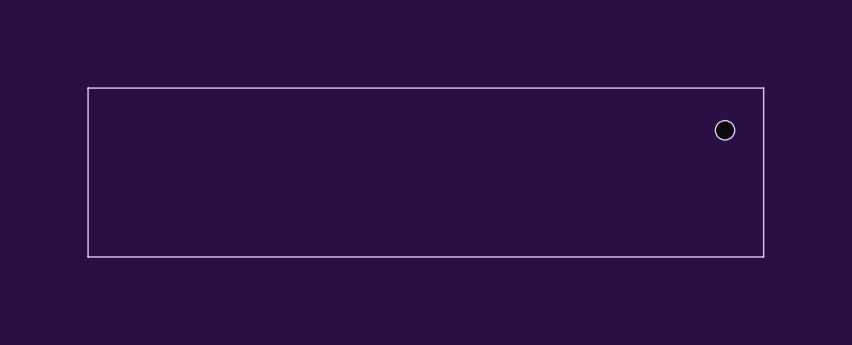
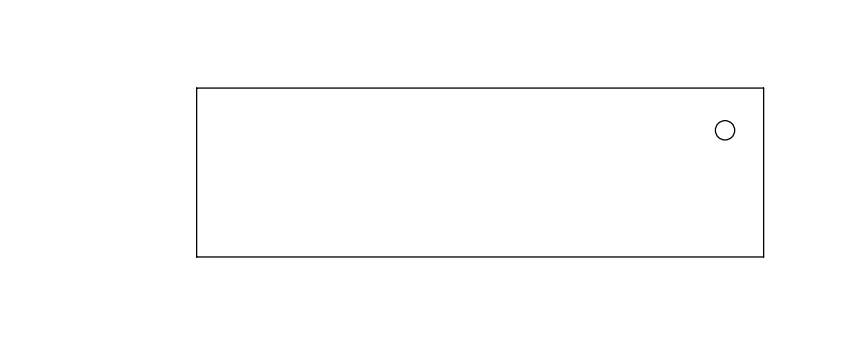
board edge: (196, 88) (88, 88) (88, 256) (196, 256) -> (196, 88) (196, 256)

